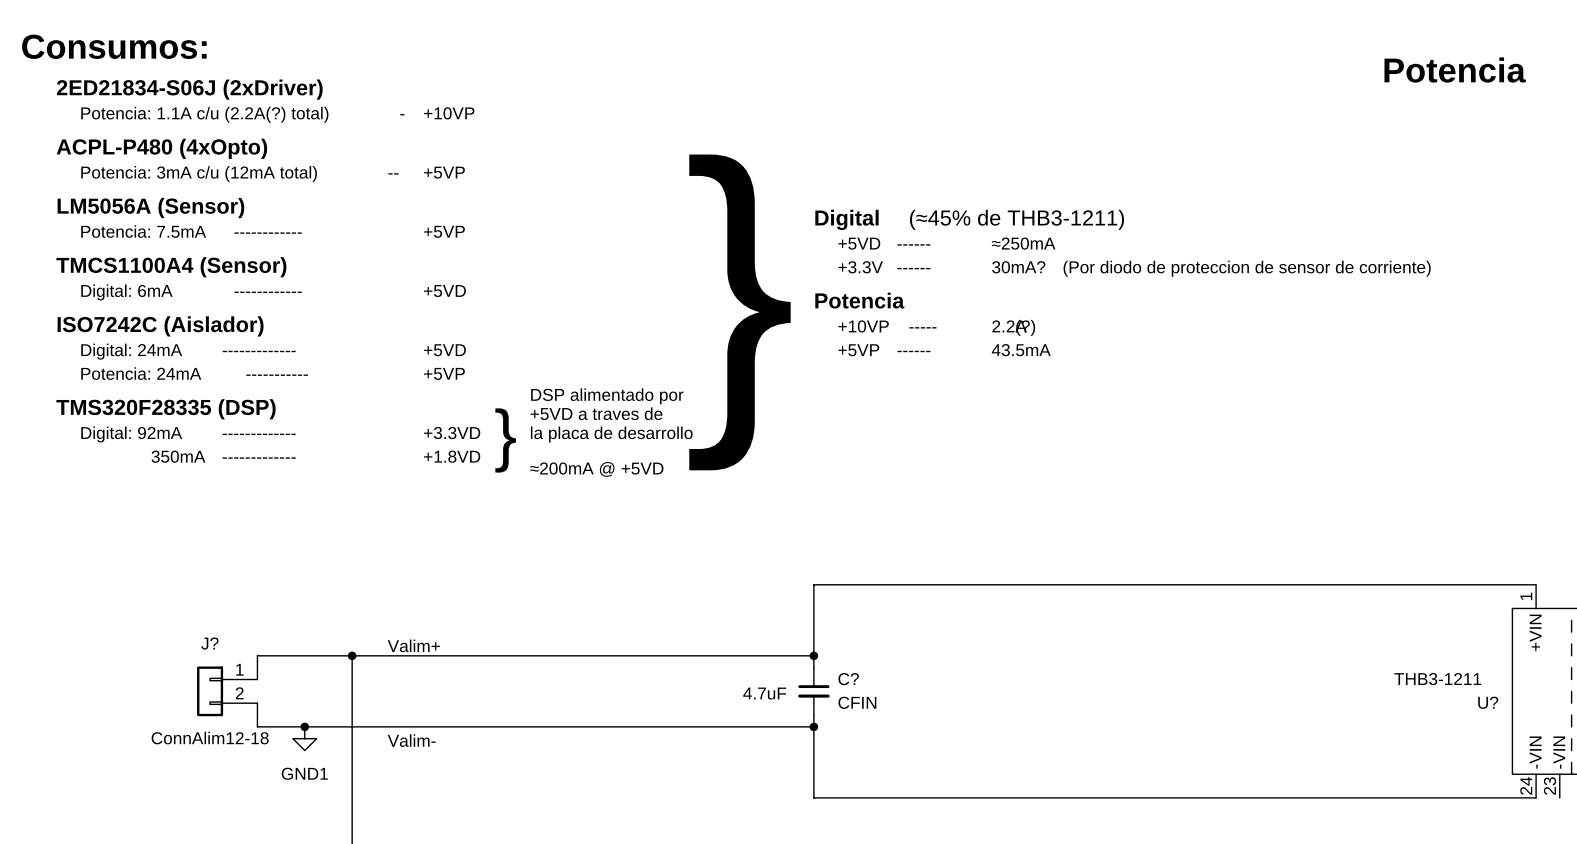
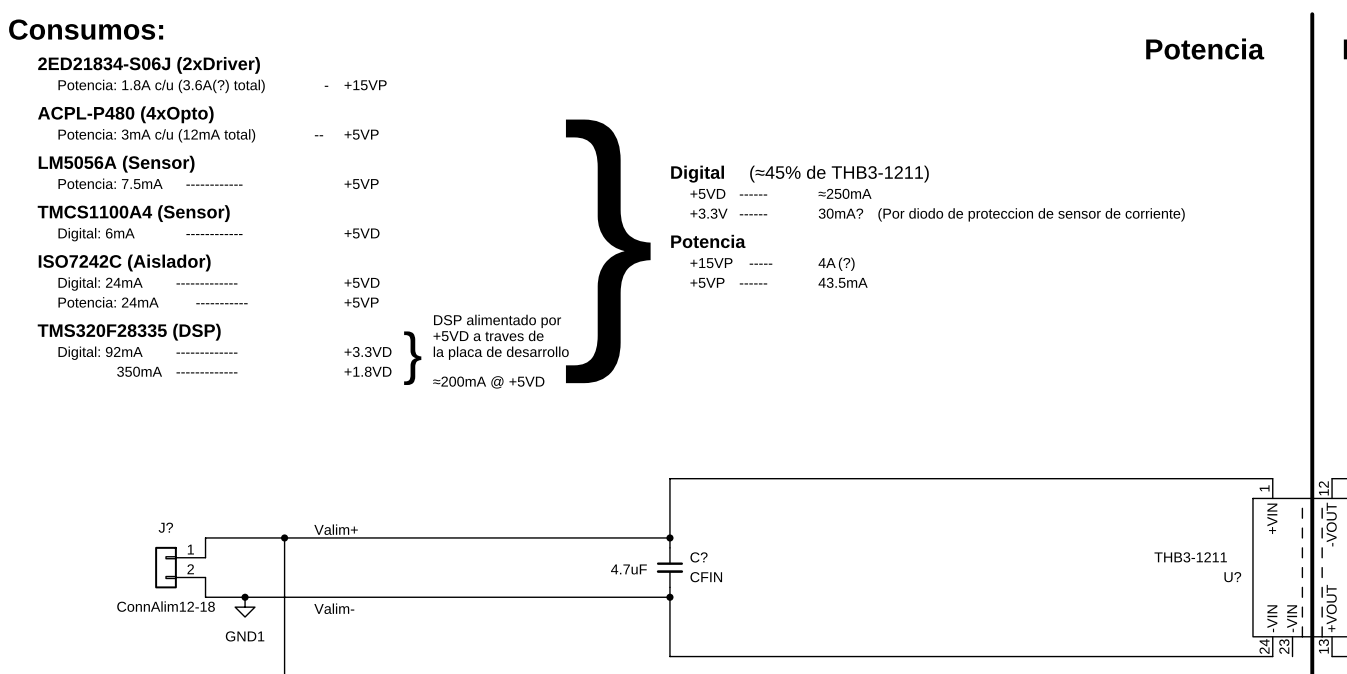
text: +10VP (449, 113) -> +15VP (365, 85)
text: Potencia: 1.1A c/u (2.2A(?) total) (204, 114) -> Potencia: 1.8A c/u (3.6A(?) total) (161, 86)
text: +10VP (863, 326) -> +15VP (711, 263)
text: 2.2A (1009, 326) -> 4A (827, 263)

